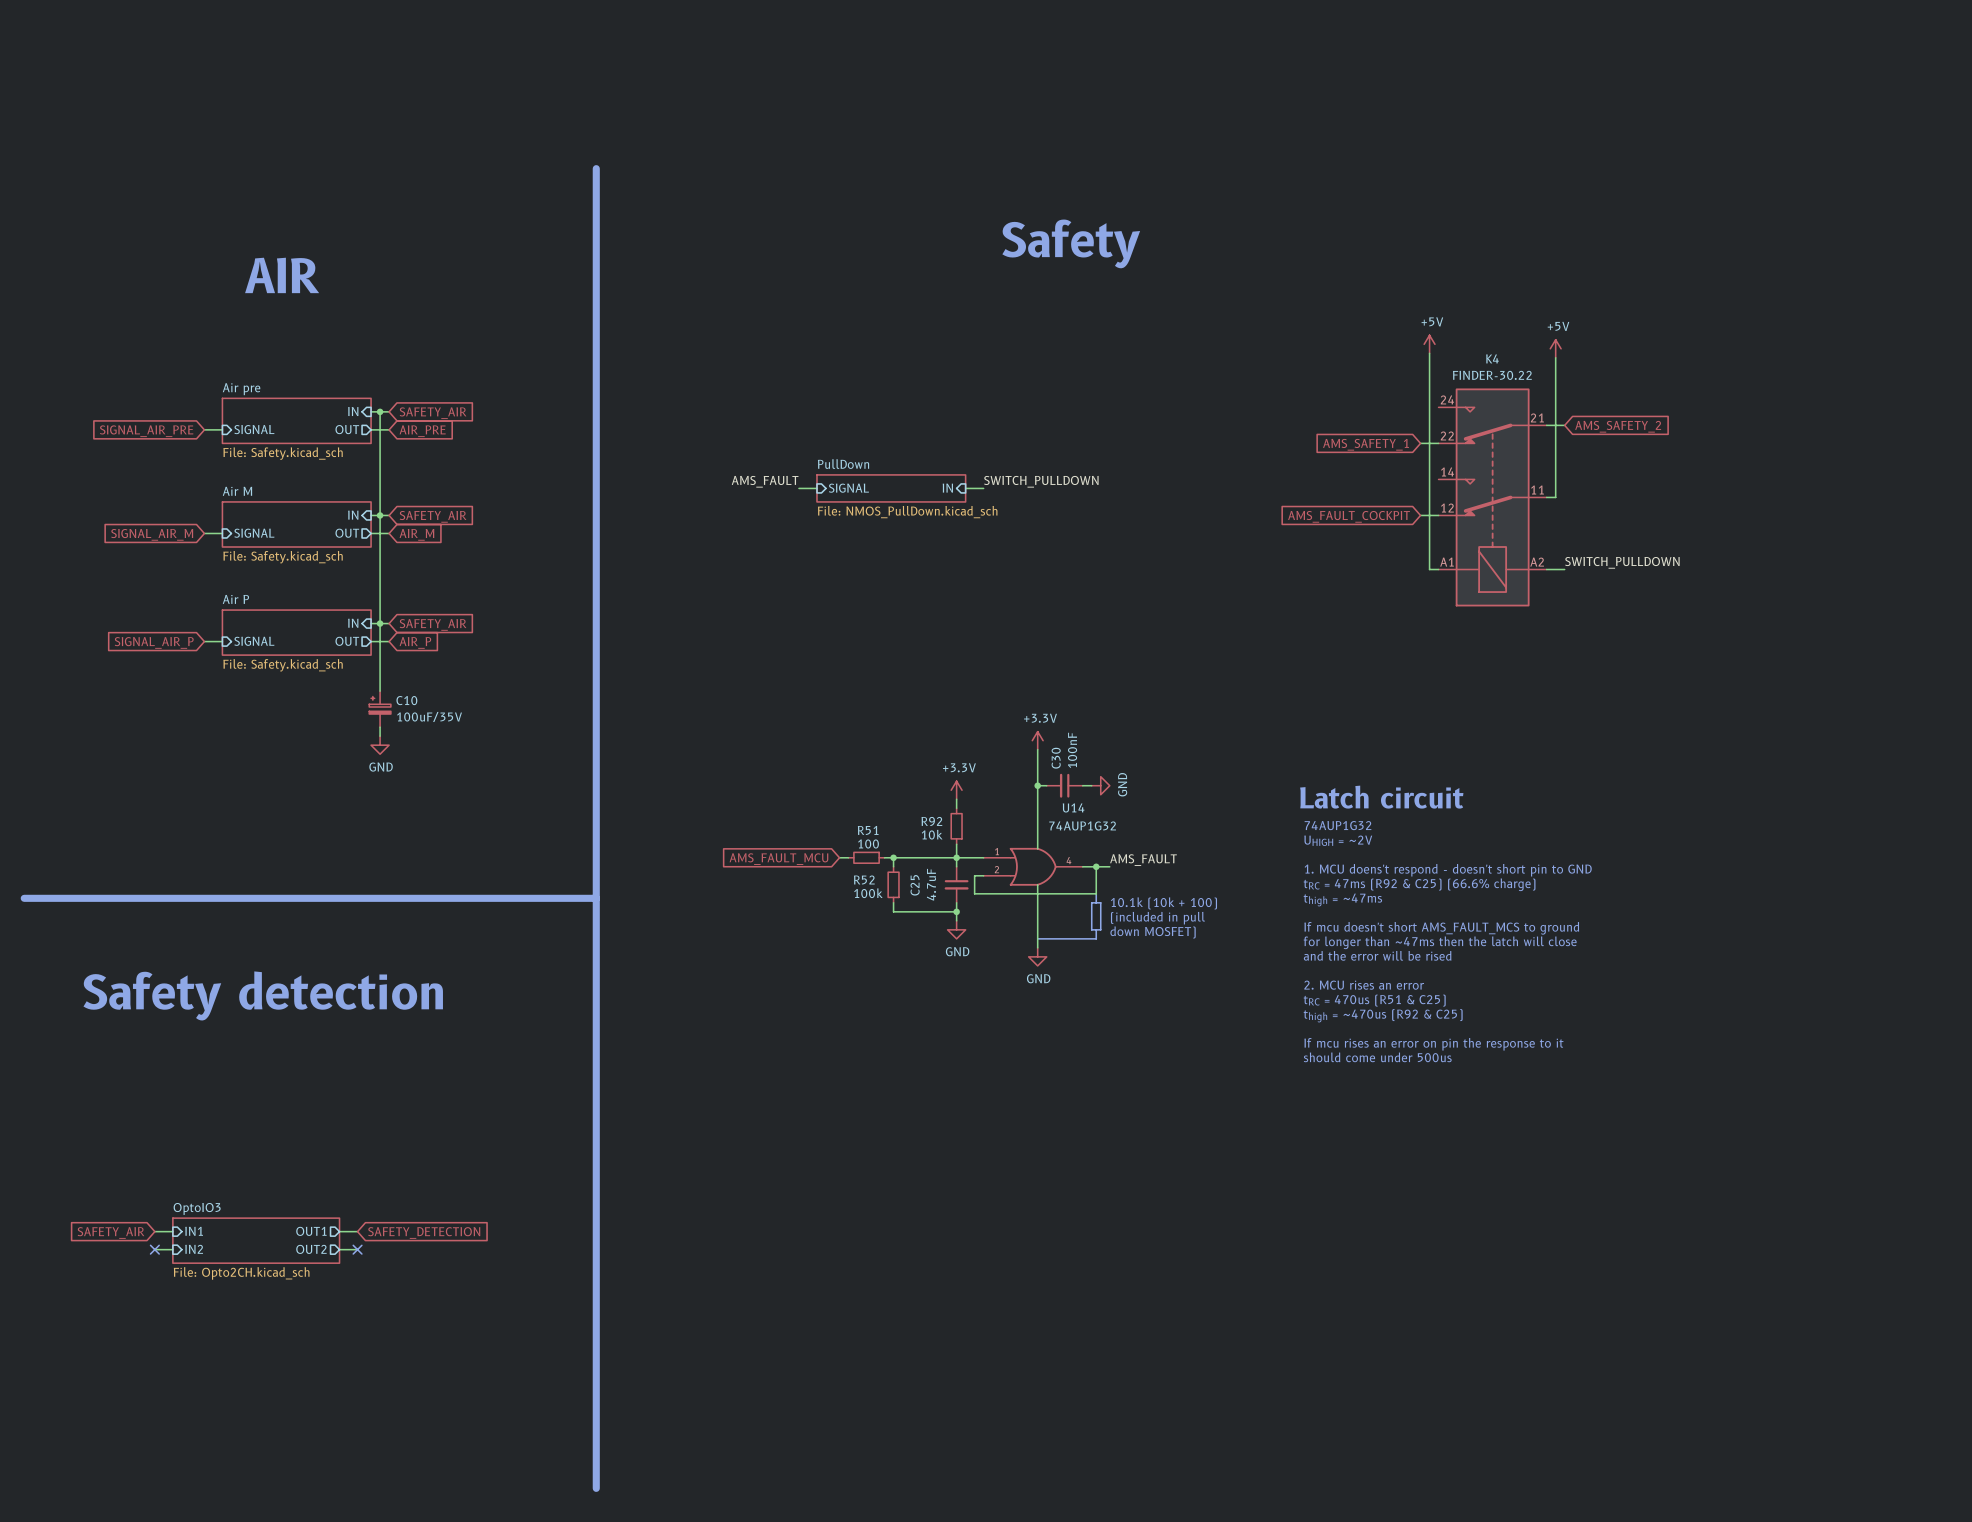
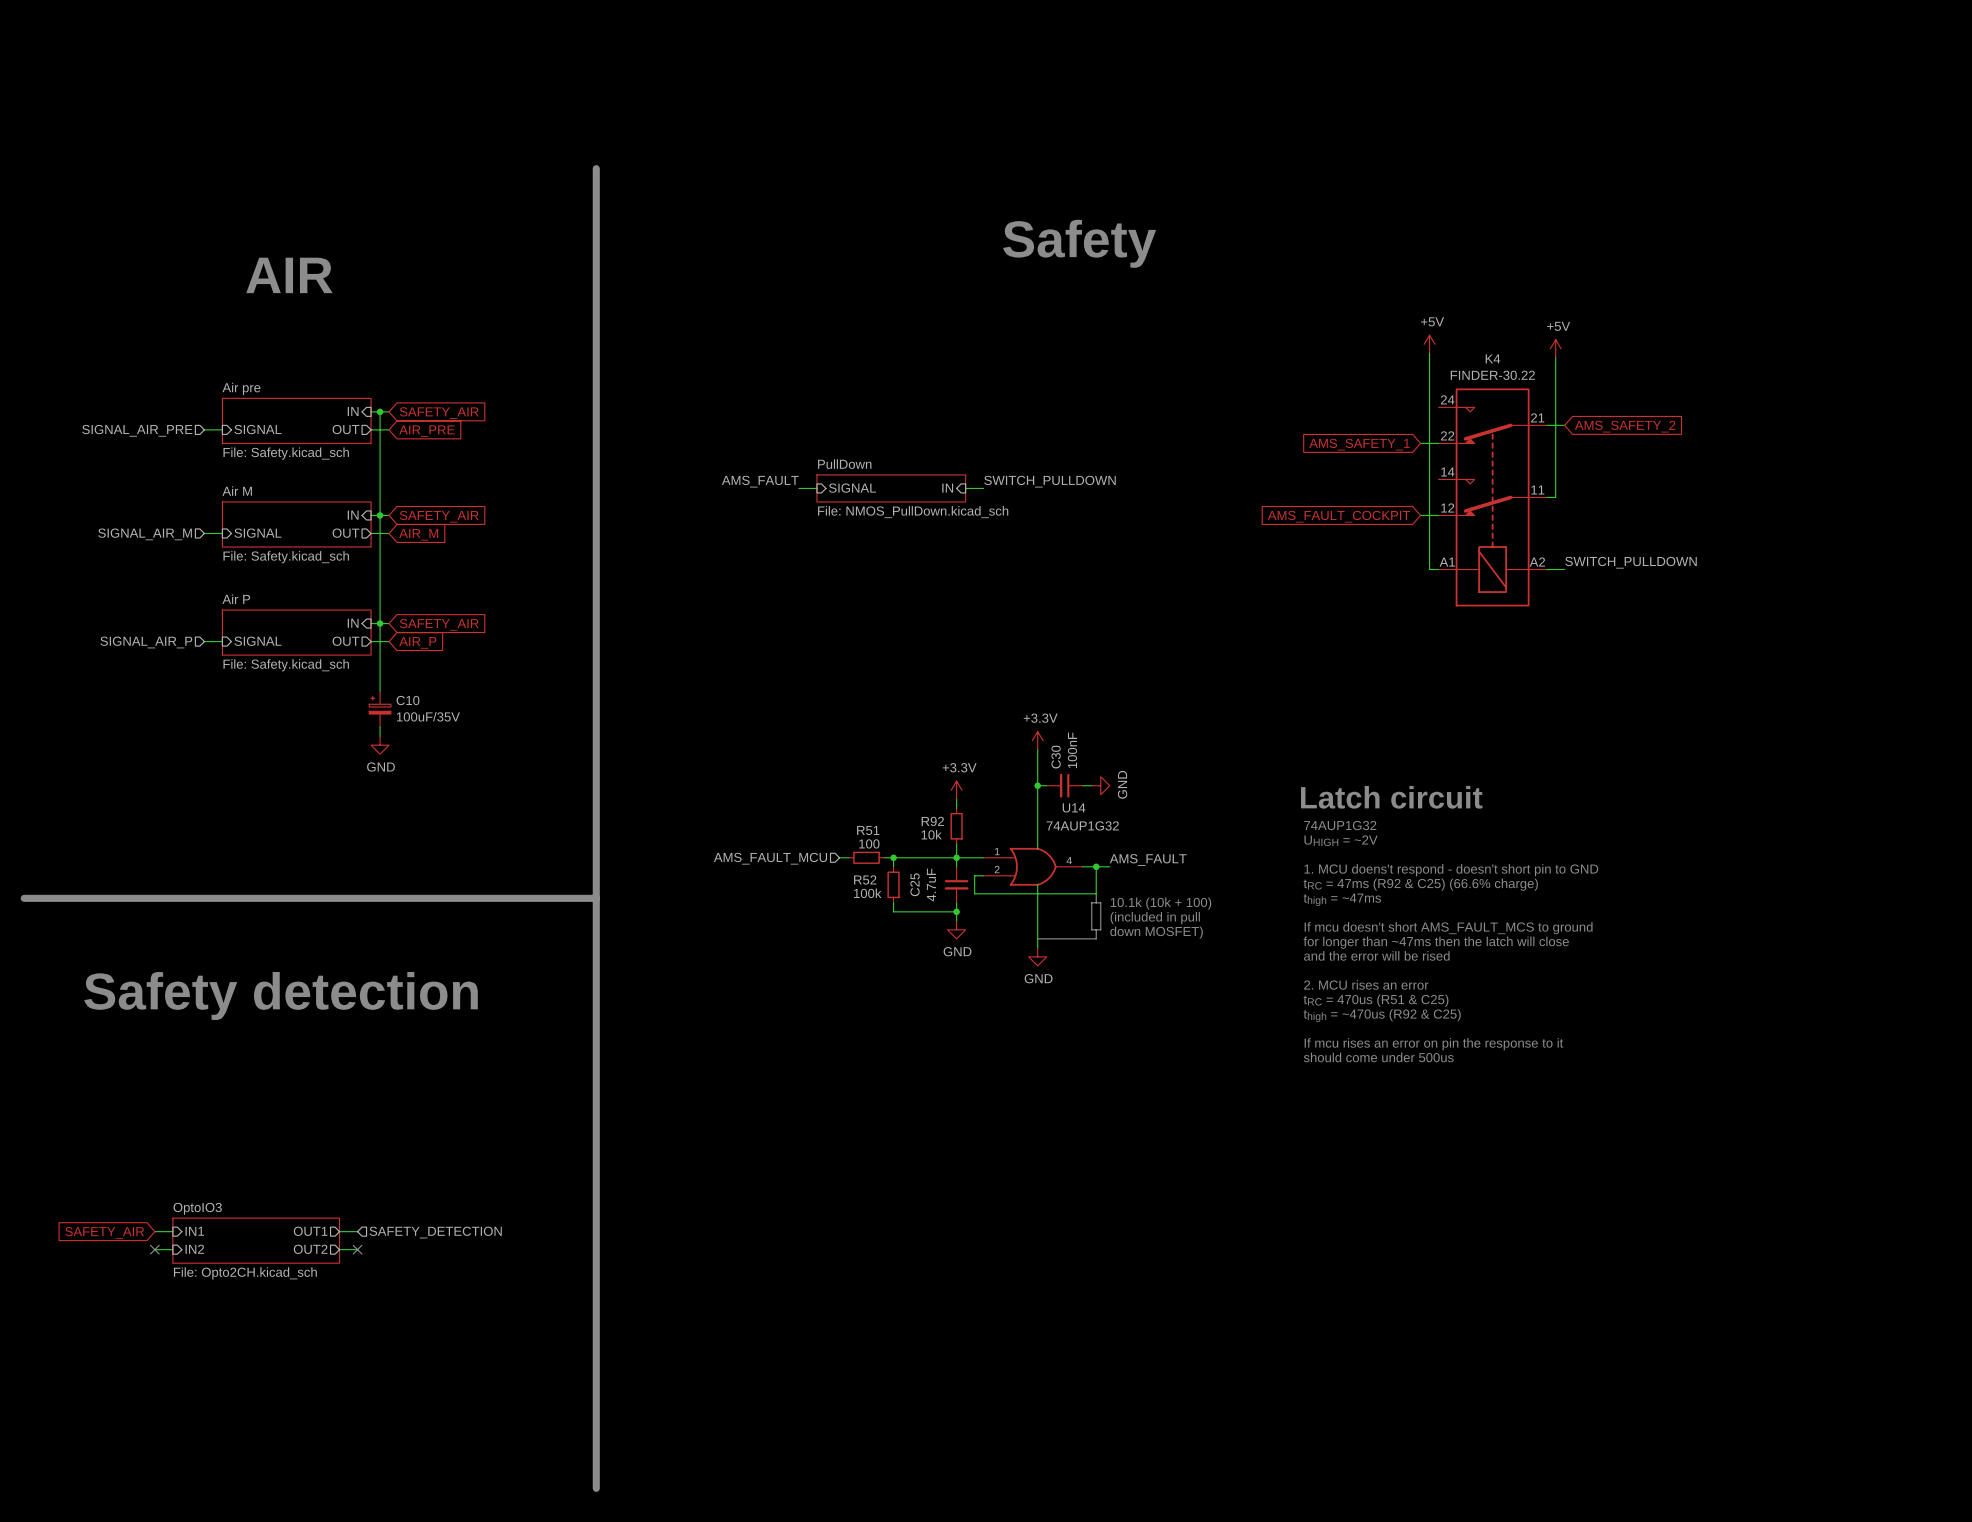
hierarchical label: none -> SIGNAL_AIR_PRE (137, 430)
global label: SIGNAL_AIR_PRE (146, 431) -> none
hierarchical label: none -> SIGNAL_AIR_M (145, 534)
global label: SIGNAL_AIR_M (152, 534) -> none
hierarchical label: none -> SIGNAL_AIR_P (146, 642)
global label: SIGNAL_AIR_P (154, 642) -> none
hierarchical label: none -> AMS_FAULT_MCU (770, 858)
global label: AMS_FAULT_MCU (778, 859) -> none
global label: SAFETY_DETECTION (424, 1232) -> none
hierarchical label: none -> SAFETY_DETECTION (435, 1232)

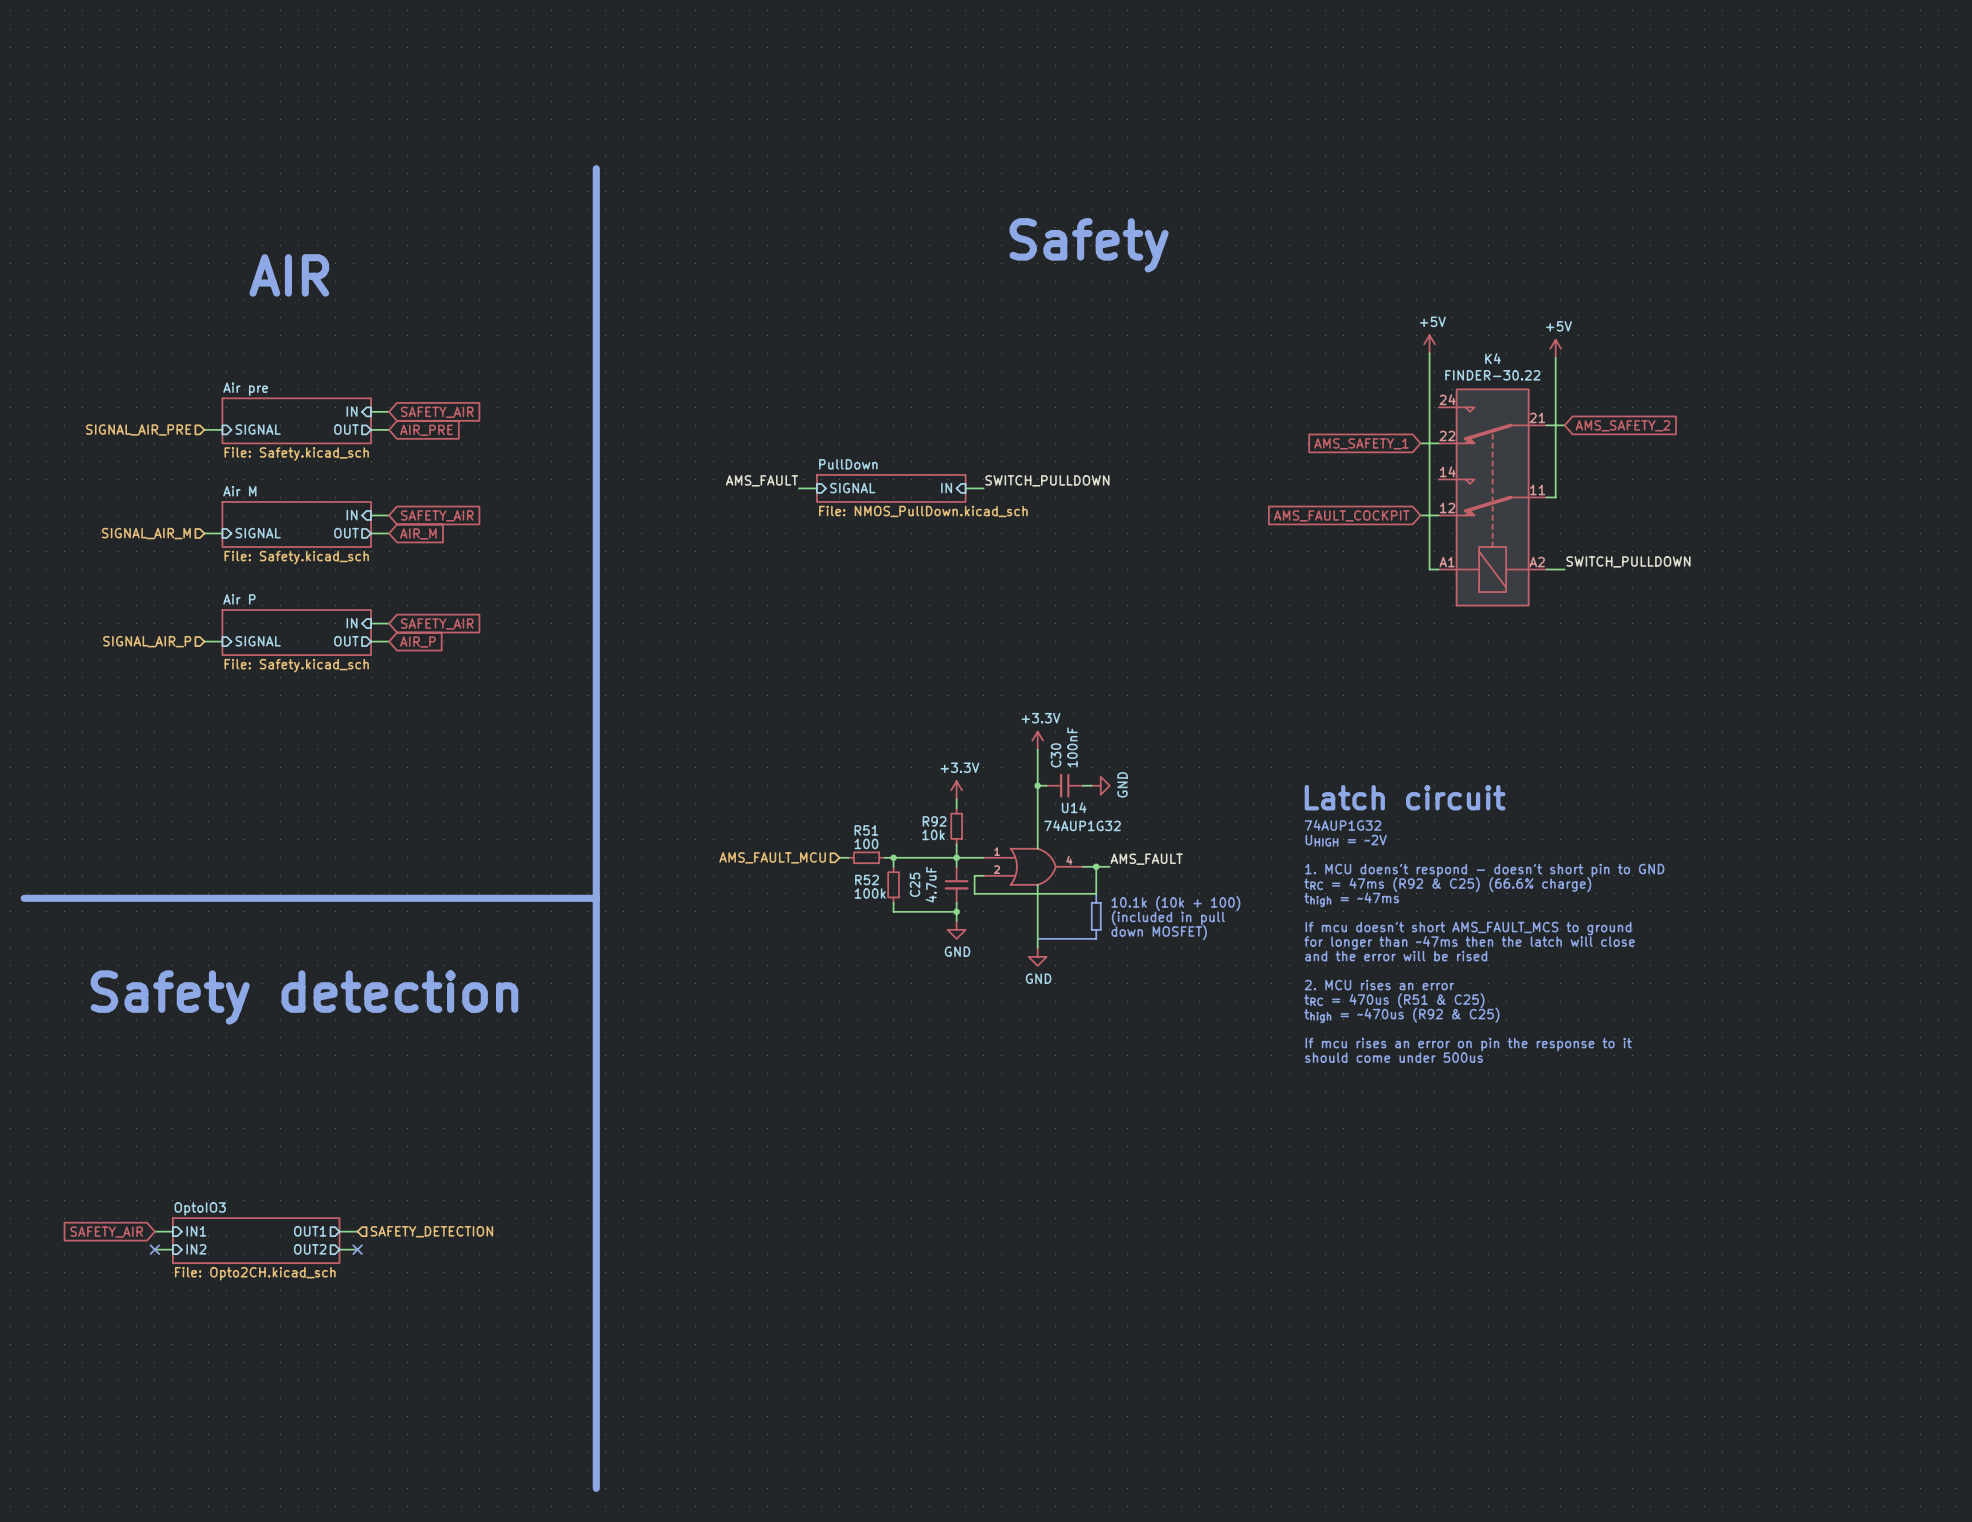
wire: (380, 411) (380, 691) -> none
junction: (380, 411) -> none
junction: (380, 515) -> none
junction: (380, 623) -> none
C10: 100uF/35V (380, 709) -> none
wire: (380, 727) (380, 736) -> none
power symbol: GND (380, 745) -> none

